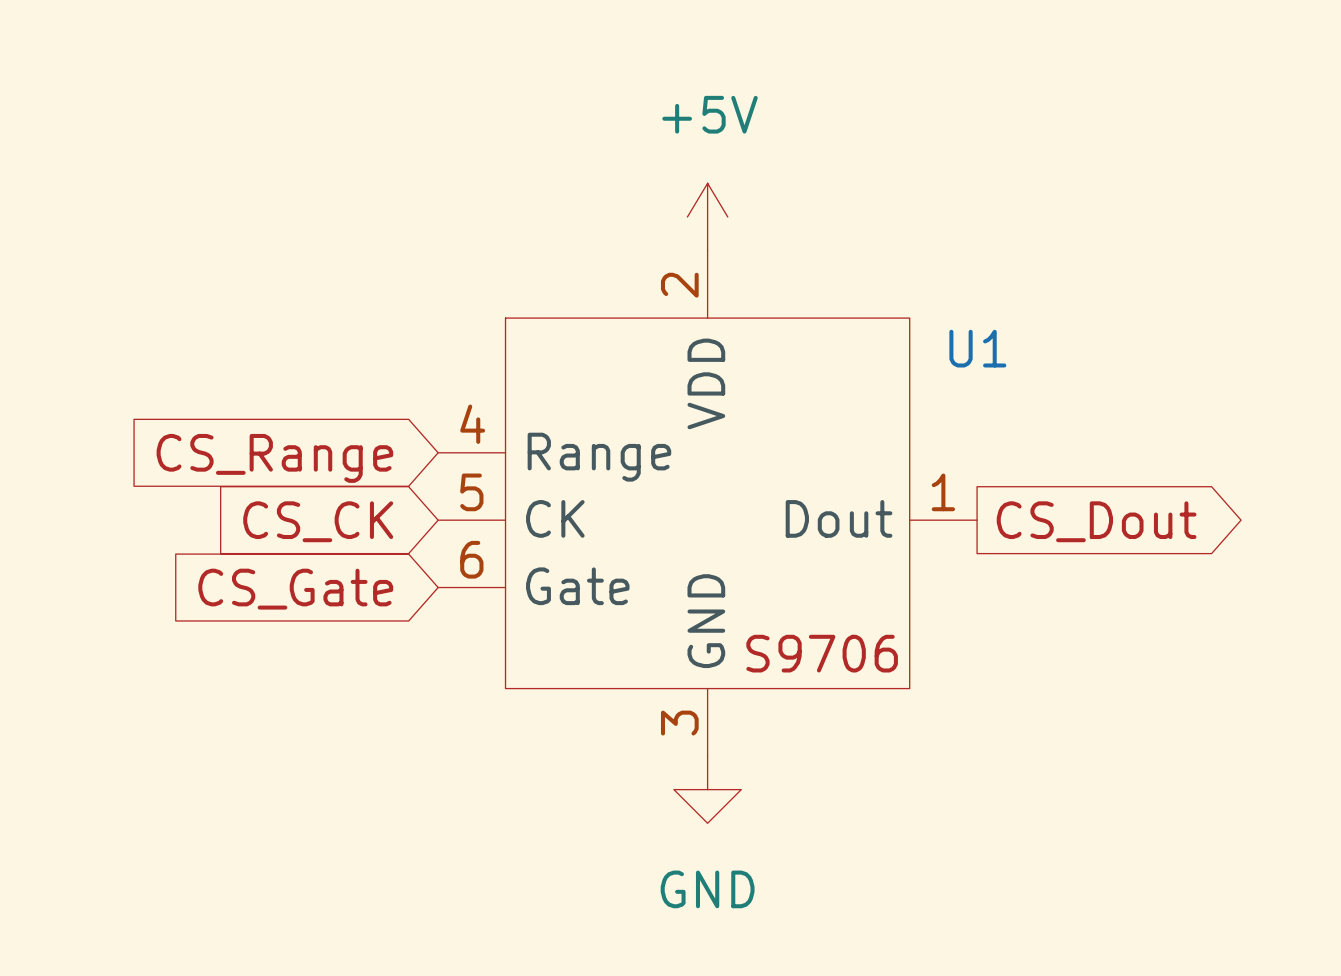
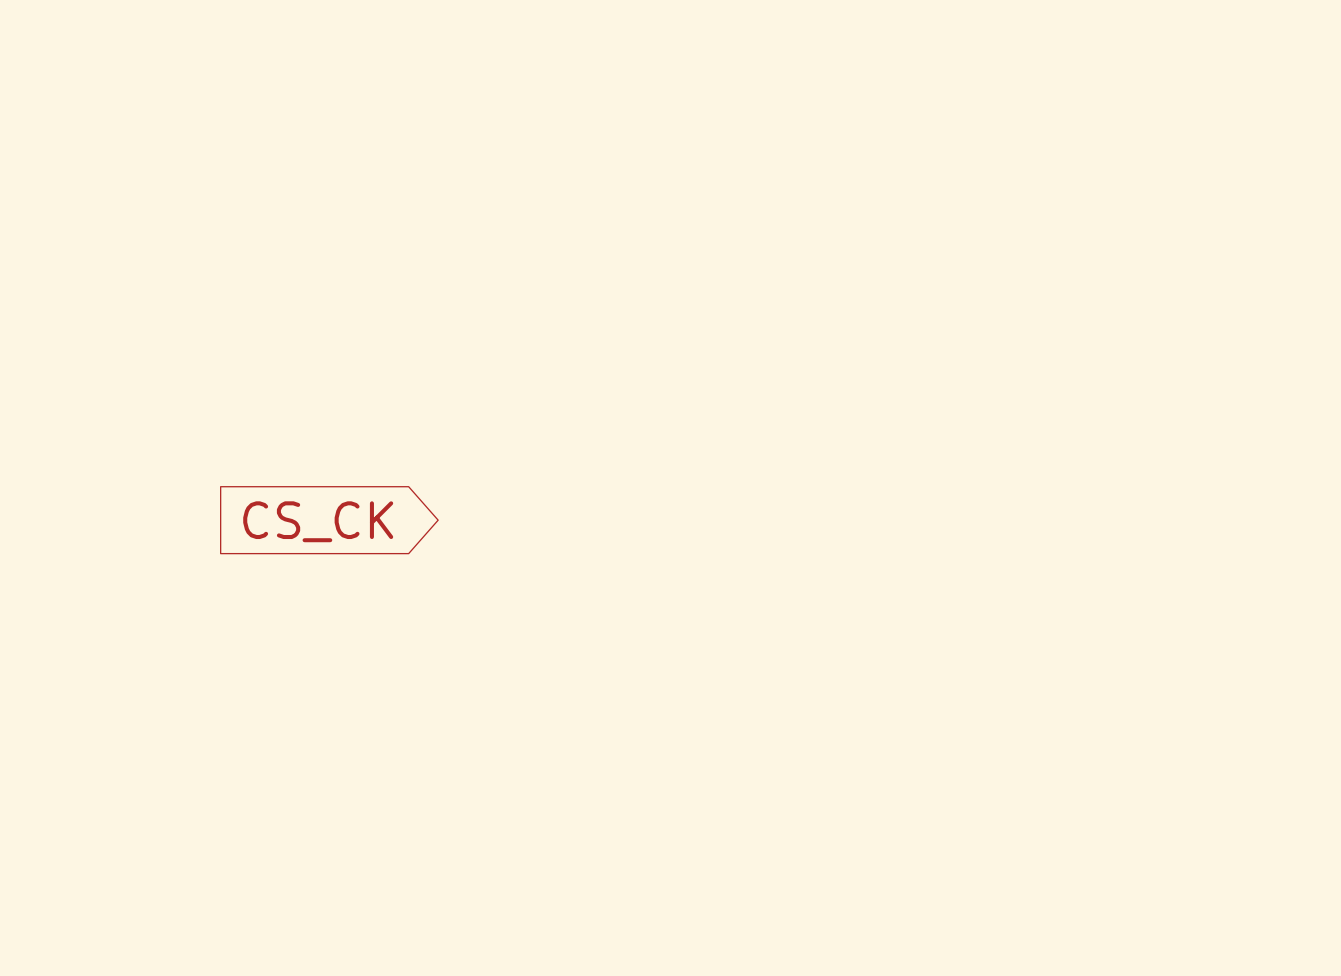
power symbol: +5V (707, 217) -> none
global label: CS_Range (274, 458) -> none
U1: (707, 503) -> none
global label: CS_Dout (1096, 521) -> none
global label: CS_Gate (295, 589) -> none
power symbol: GND (707, 789) -> none

